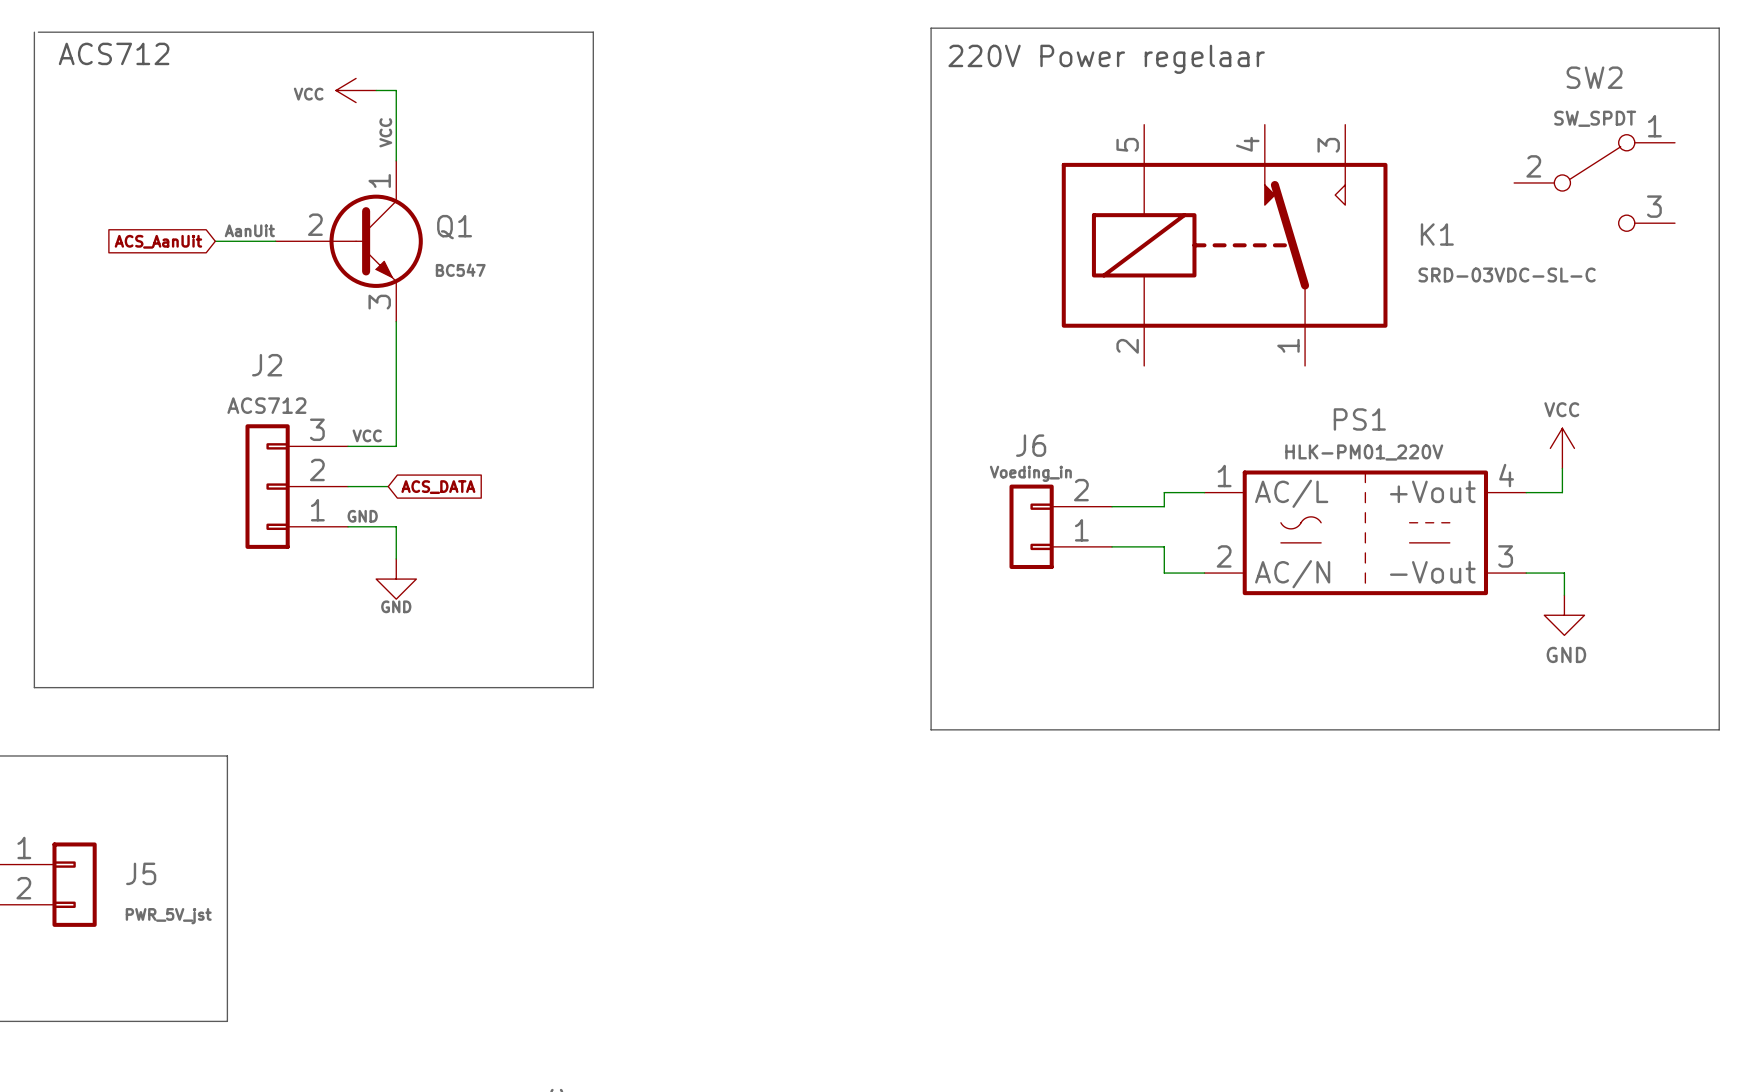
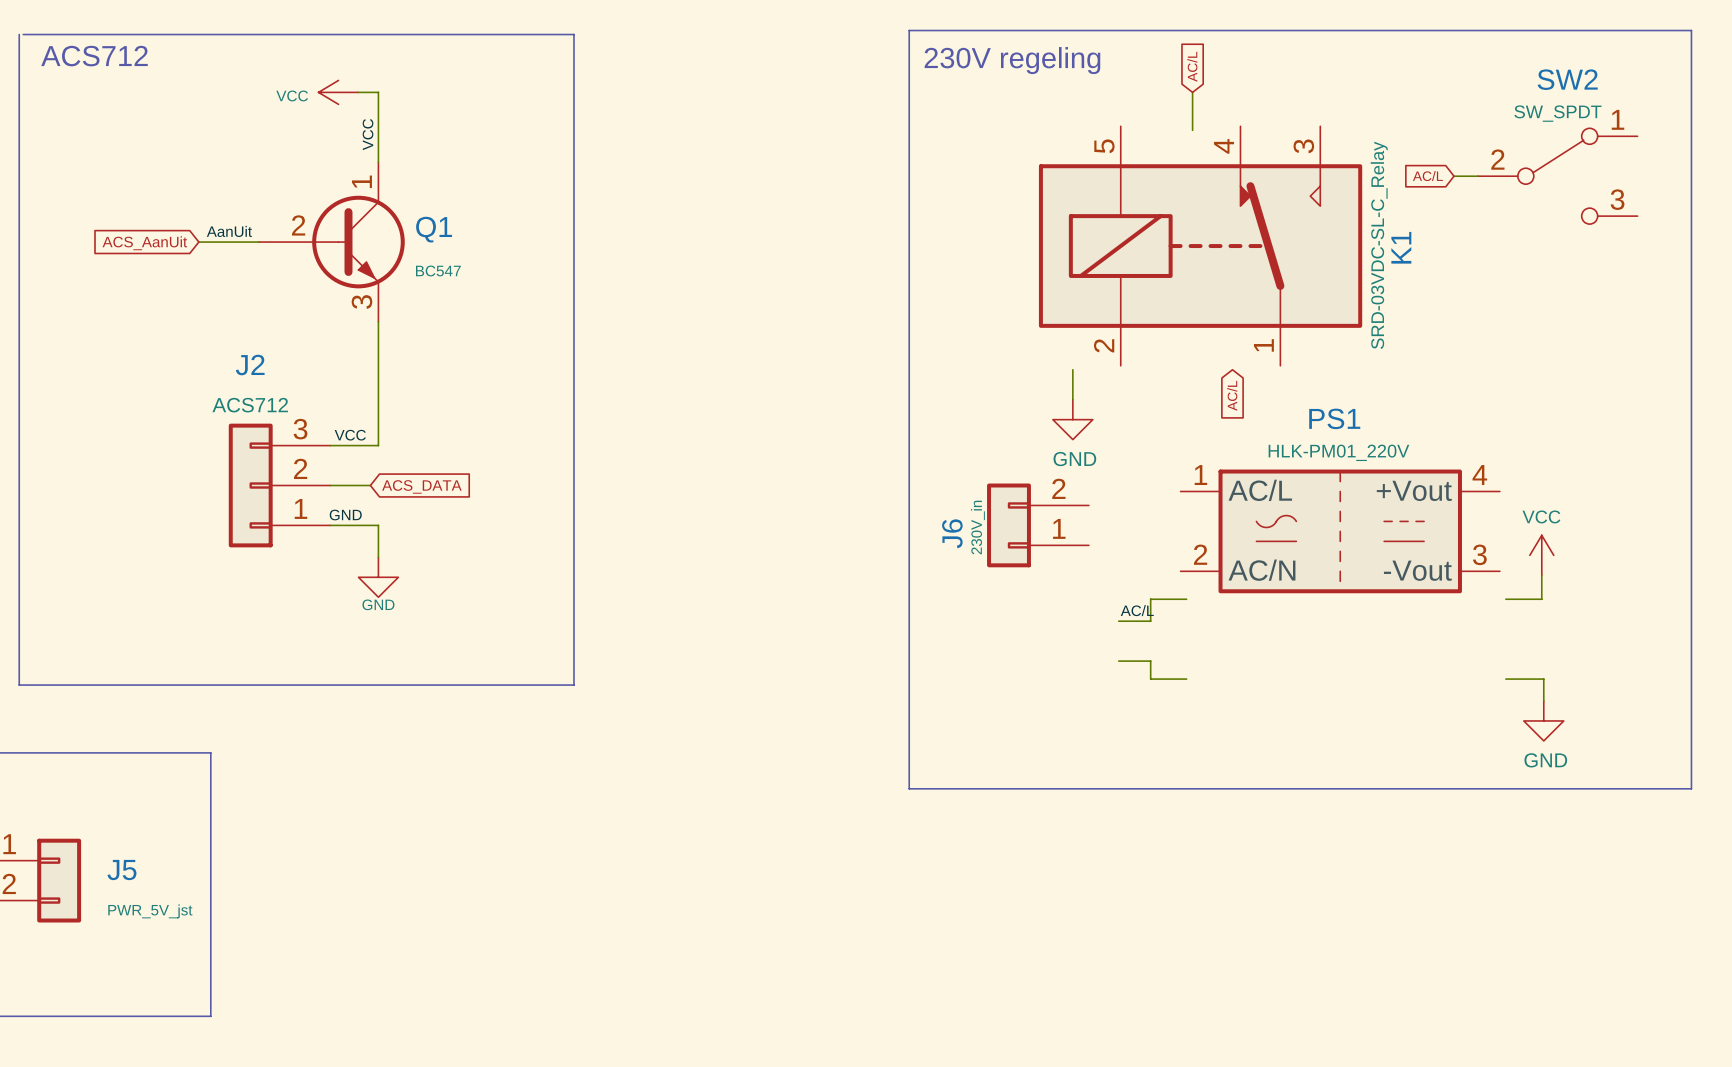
text: 220V Power regelaar (1106, 59) -> 230V regeling (1012, 60)
global label: none -> AC/L (1192, 66)
wire: none -> (1192, 92) (1192, 130)
wire: none -> (1453, 176) (1477, 176)
global label: none -> AC/L (1427, 176)
SW2 position: (1594, 182) -> (1557, 176)
K1 name rotation: 0° (1437, 234) -> 90° counterclockwise (1401, 247)
K1 value: SRD-03VDC-SL-C (1507, 274) -> SRD-03VDC-SL-C_Relay (1379, 245)
wire: none -> (1072, 369) (1072, 399)
global label: none -> AC/L (1232, 395)
power symbol: none -> GND (1072, 419)
J6 name rotation: 0° (1031, 445) -> 90° counterclockwise (952, 533)
J6 name position: J6 (1031, 445) -> J6 (952, 533)
power symbol position: VCC (1562, 448) -> VCC (1541, 555)
wire: (1562, 468) (1562, 492) (1526, 492) -> (1541, 575) (1541, 599) (1505, 599)
J6 value: Voeding_in (1030, 473) -> 230V_in (977, 527)
wire: (1204, 492) (1164, 492) (1164, 506) (1112, 506) -> none
wire: (1112, 546) (1164, 546) (1164, 573) (1204, 573) -> none
wire: (1526, 573) (1564, 573) (1564, 595) -> (1505, 679) (1543, 679) (1543, 701)
wire: none -> (1186, 599) (1150, 599) (1150, 621) (1118, 621)
label: none -> AC/L (1137, 610)
power symbol position: GND (1564, 615) -> GND (1543, 720)
wire: none -> (1118, 661) (1150, 661) (1150, 679) (1186, 679)
line: (931, 729) (1719, 729) -> (909, 726) (909, 788) (1691, 788) (1691, 726)

